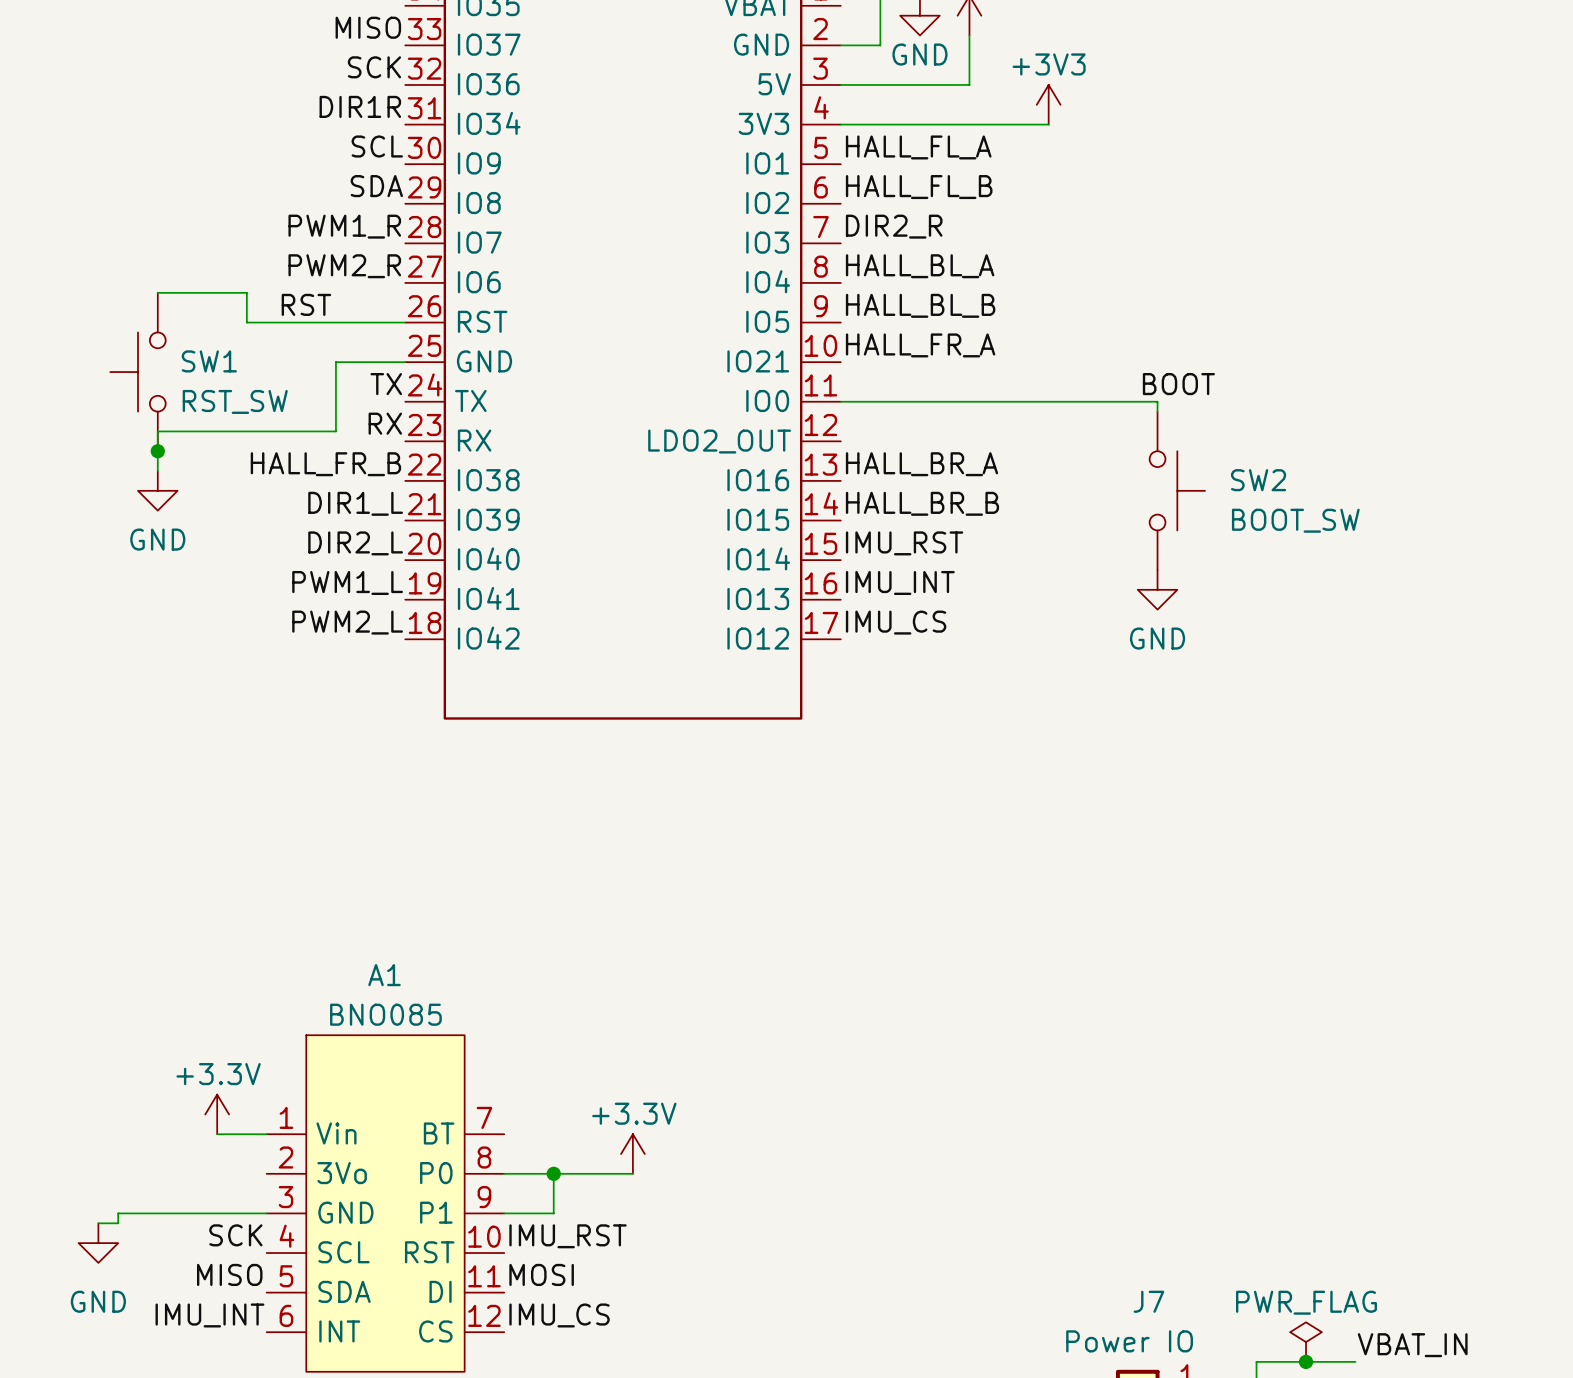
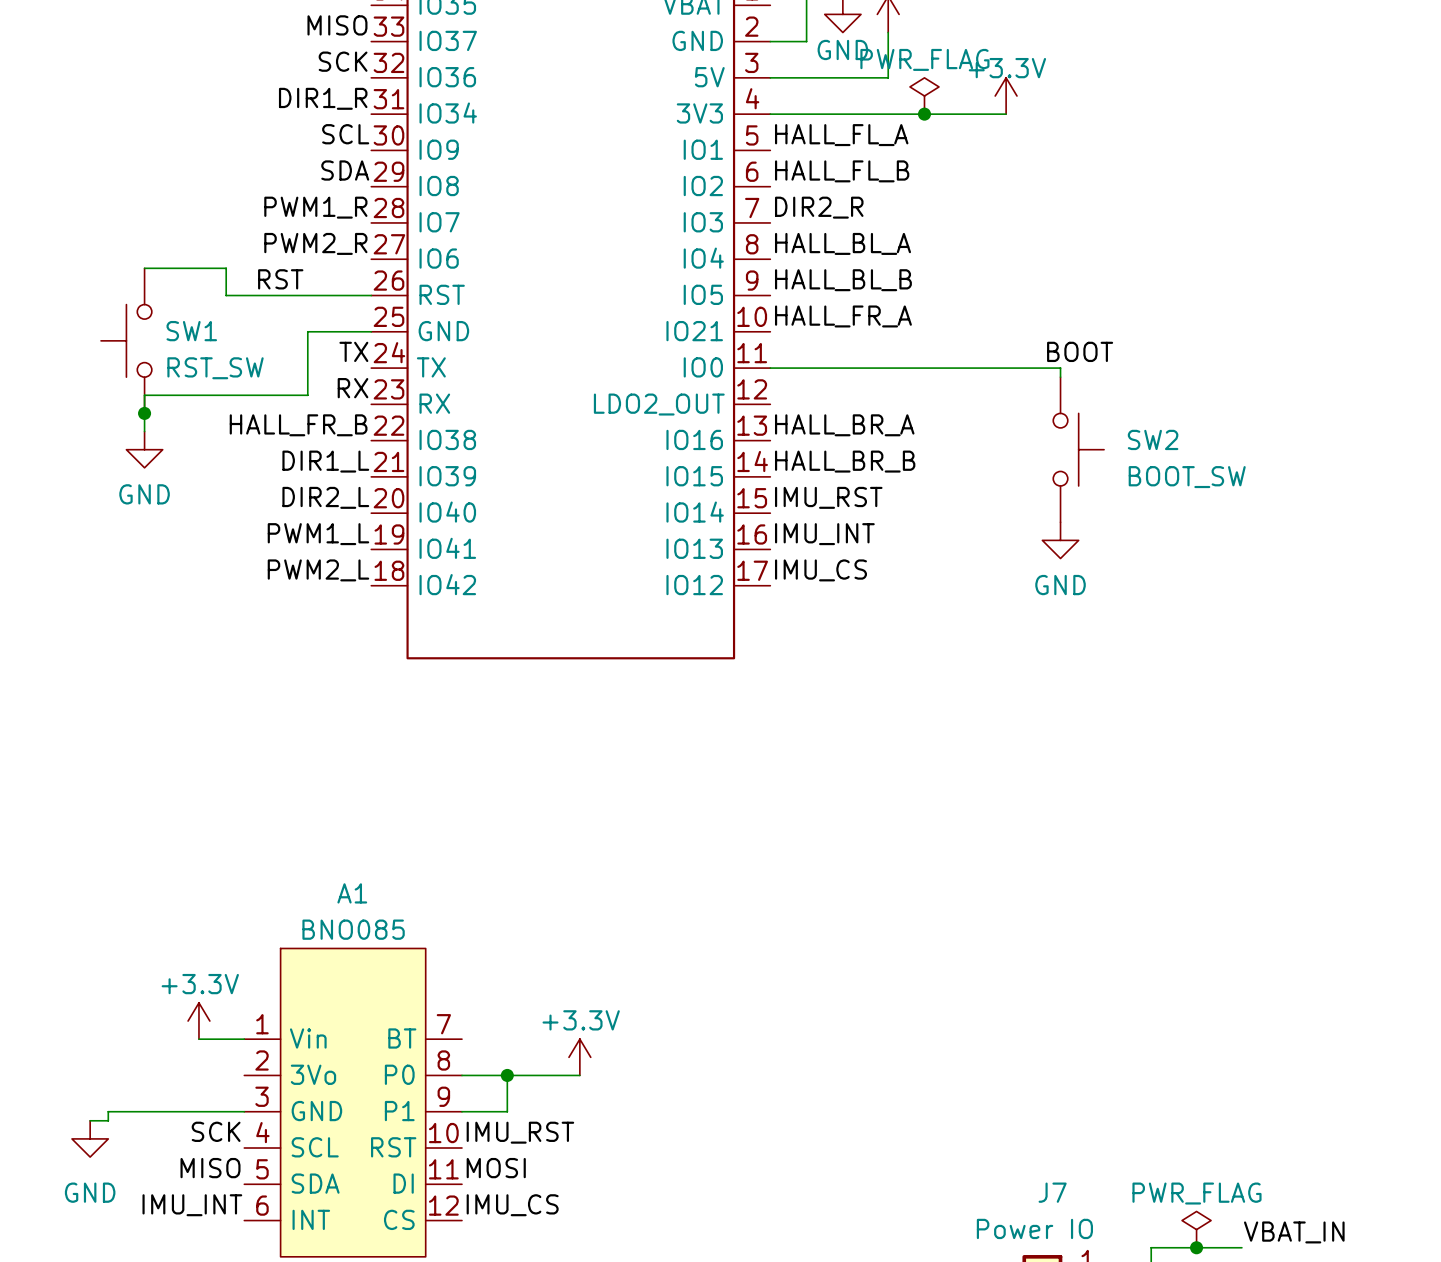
power symbol: none -> PWR_FLAG (924, 96)
power symbol: +3V3 (1048, 104) -> none
power symbol: none -> +3.3V (1006, 96)
label: DIR1R (360, 106) -> DIR1_R (323, 98)
junction: none -> (924, 114)
wire: none -> (960, 114) (1006, 114)

